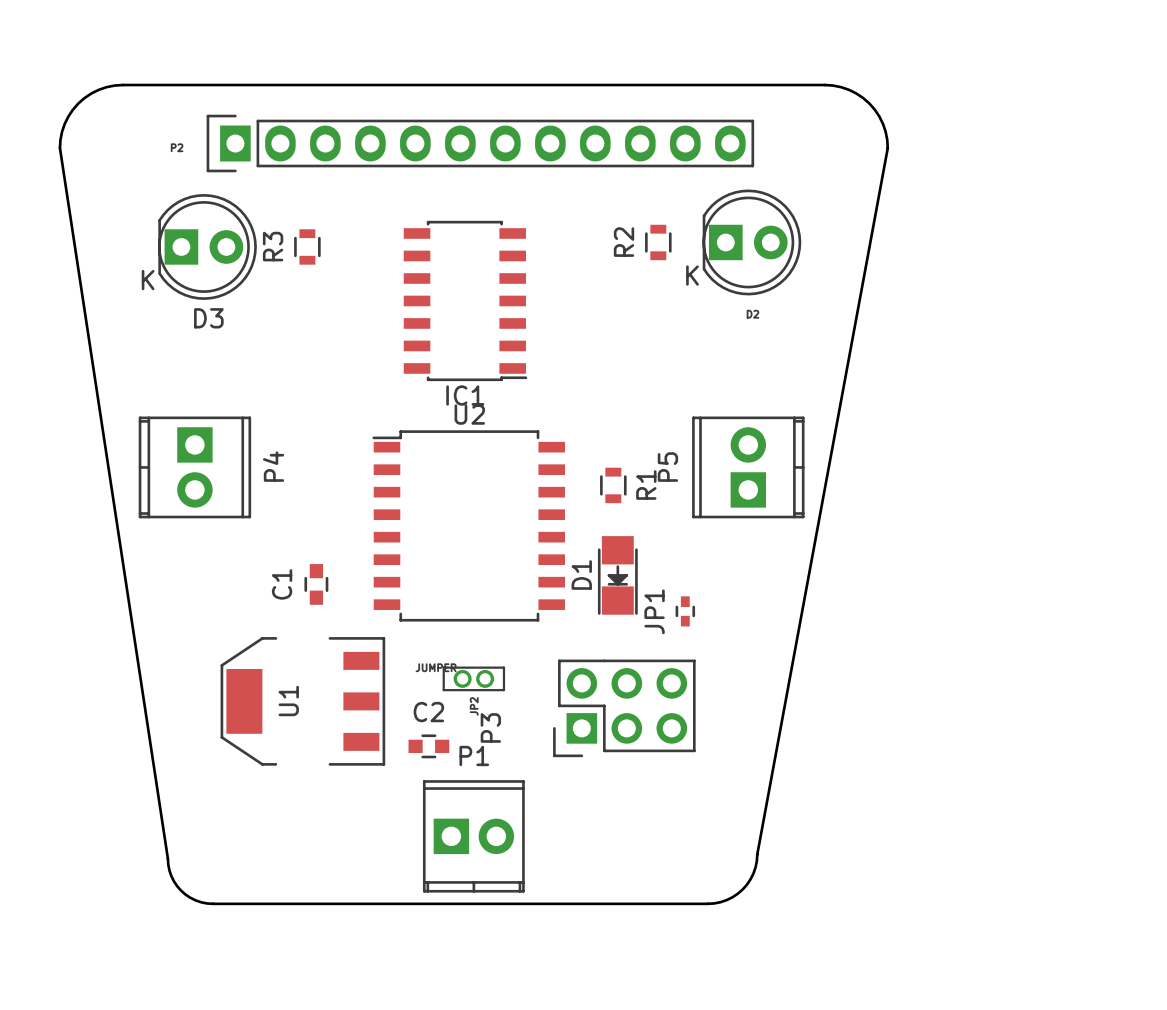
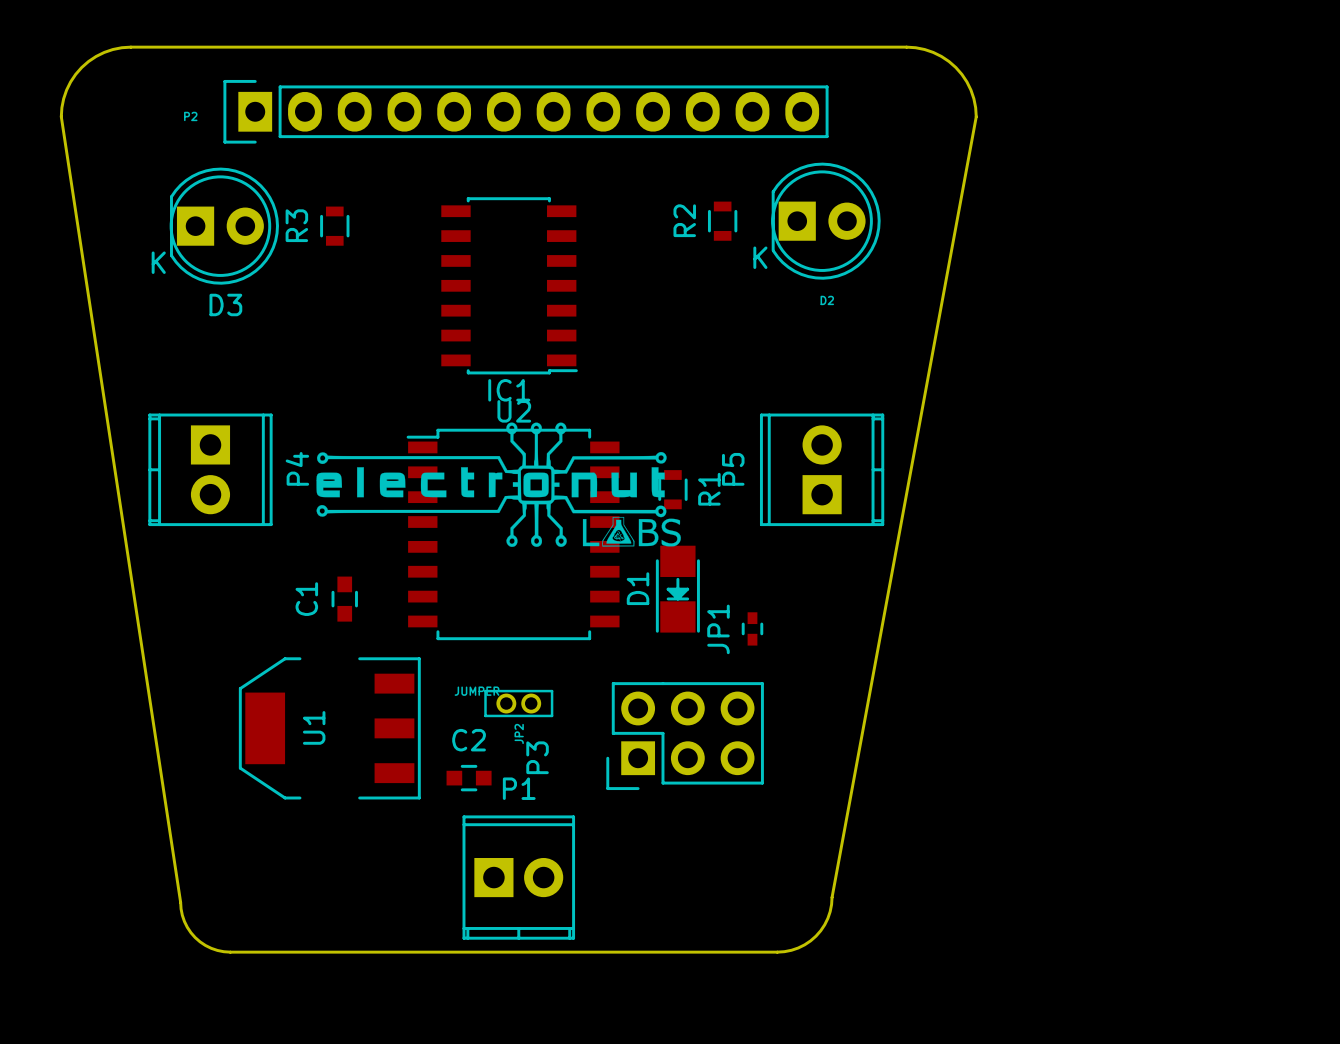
drawing: none -> [316, 422, 681, 547]

